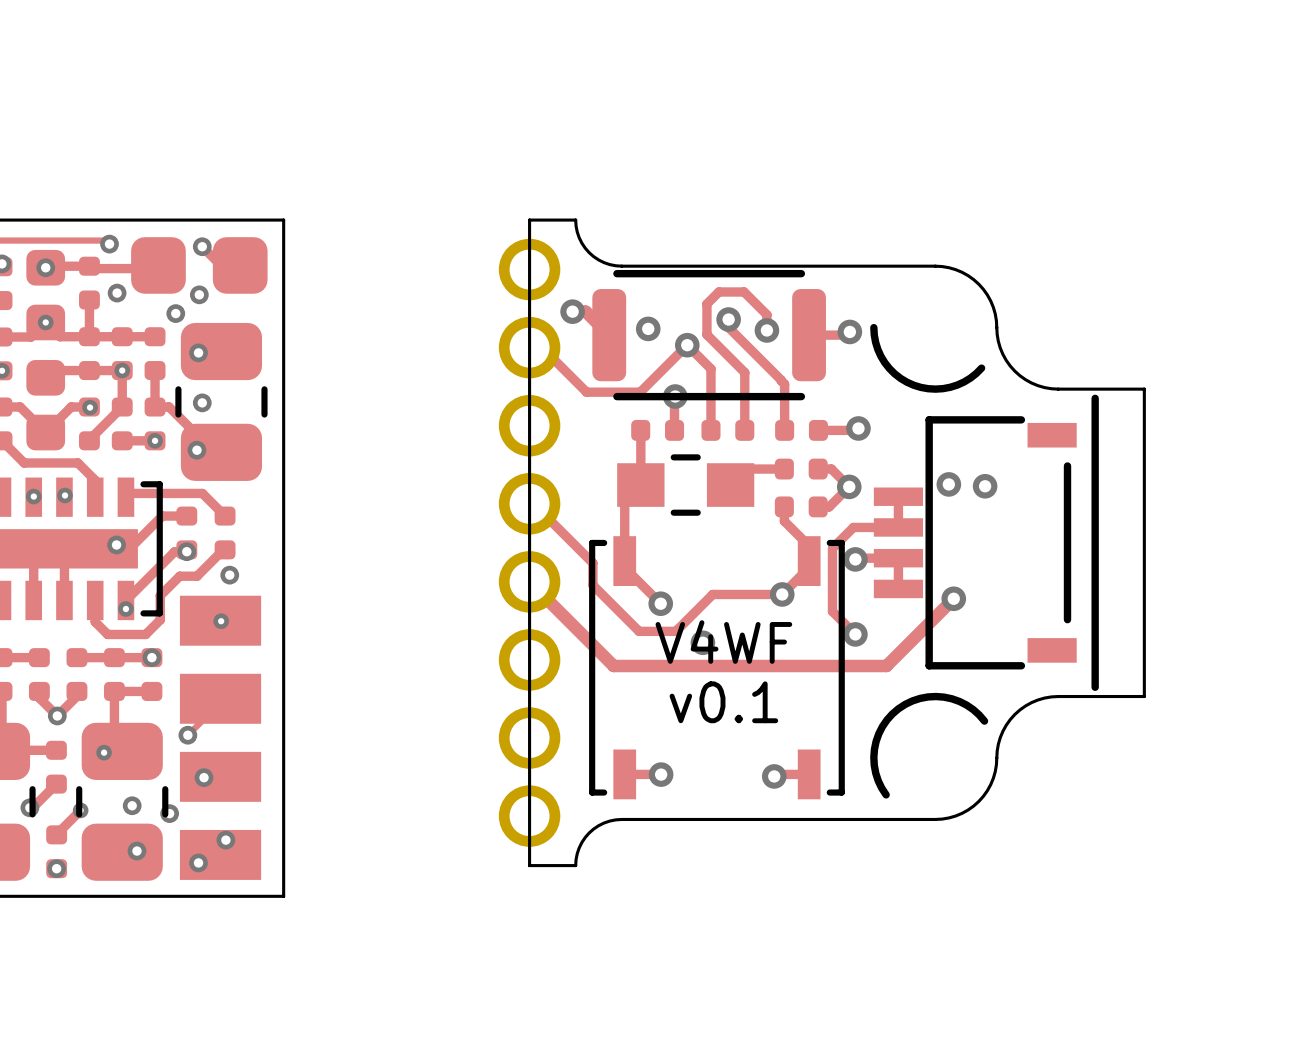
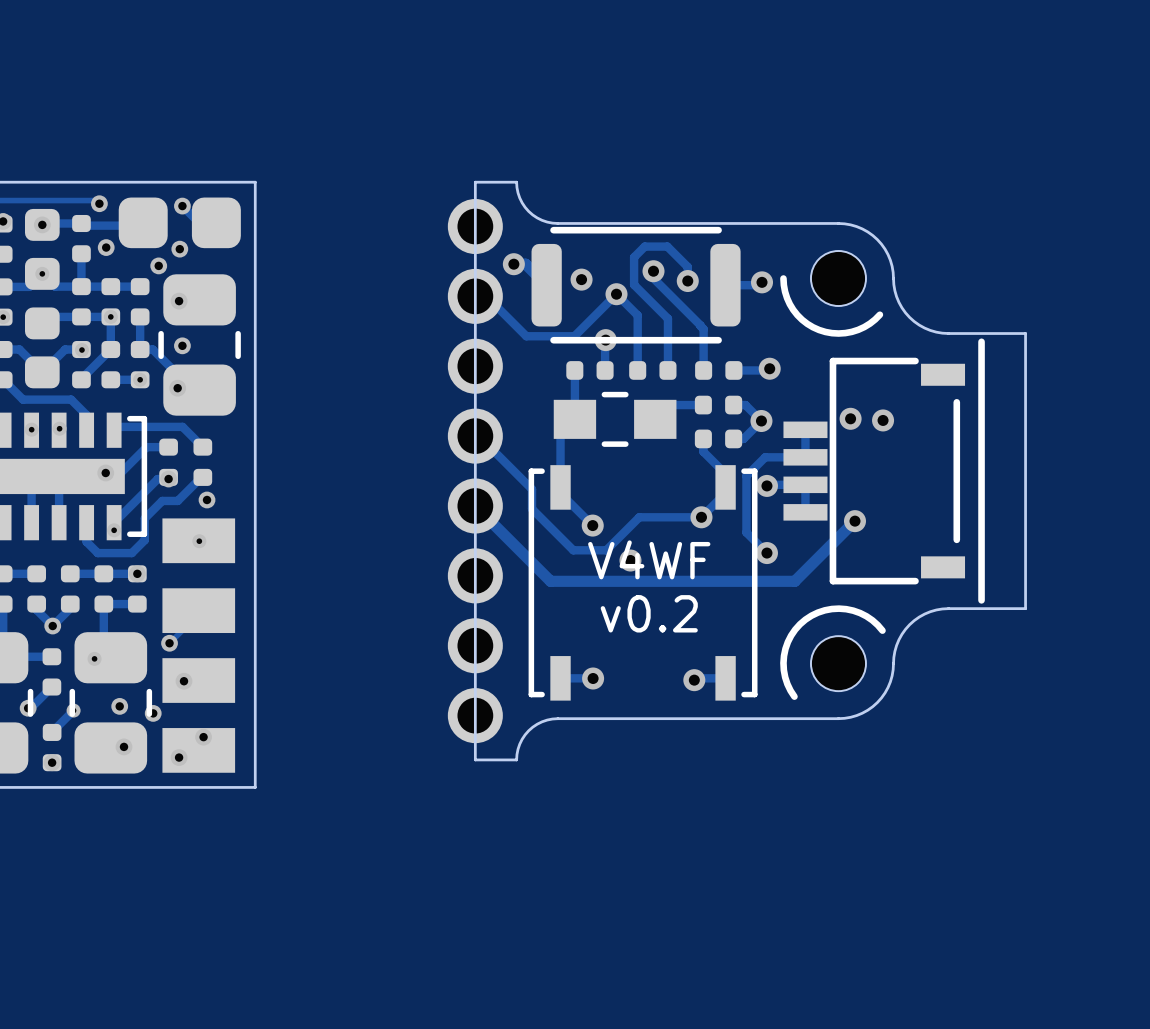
part: none -> (838, 278)
text: v0.1 (723, 702) -> v0.2 (649, 613)
part: none -> (838, 663)

